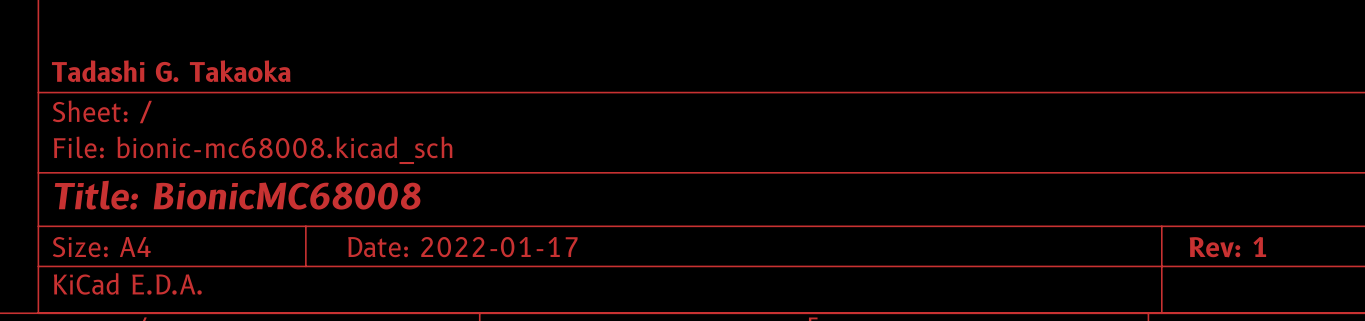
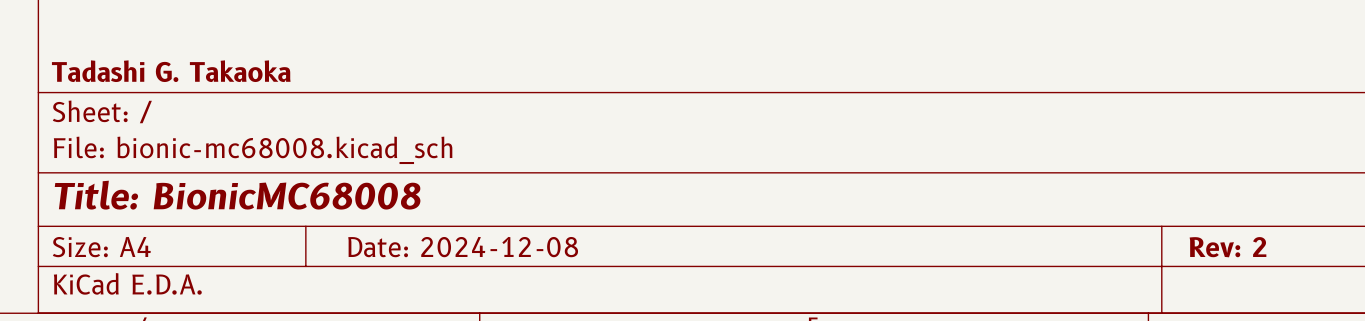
title block: Date: 2022-01-17 (462, 247) -> Date: 2024-12-08 (463, 247)
title block: Rev: 1 (1227, 247) -> Rev: 2 (1228, 247)

